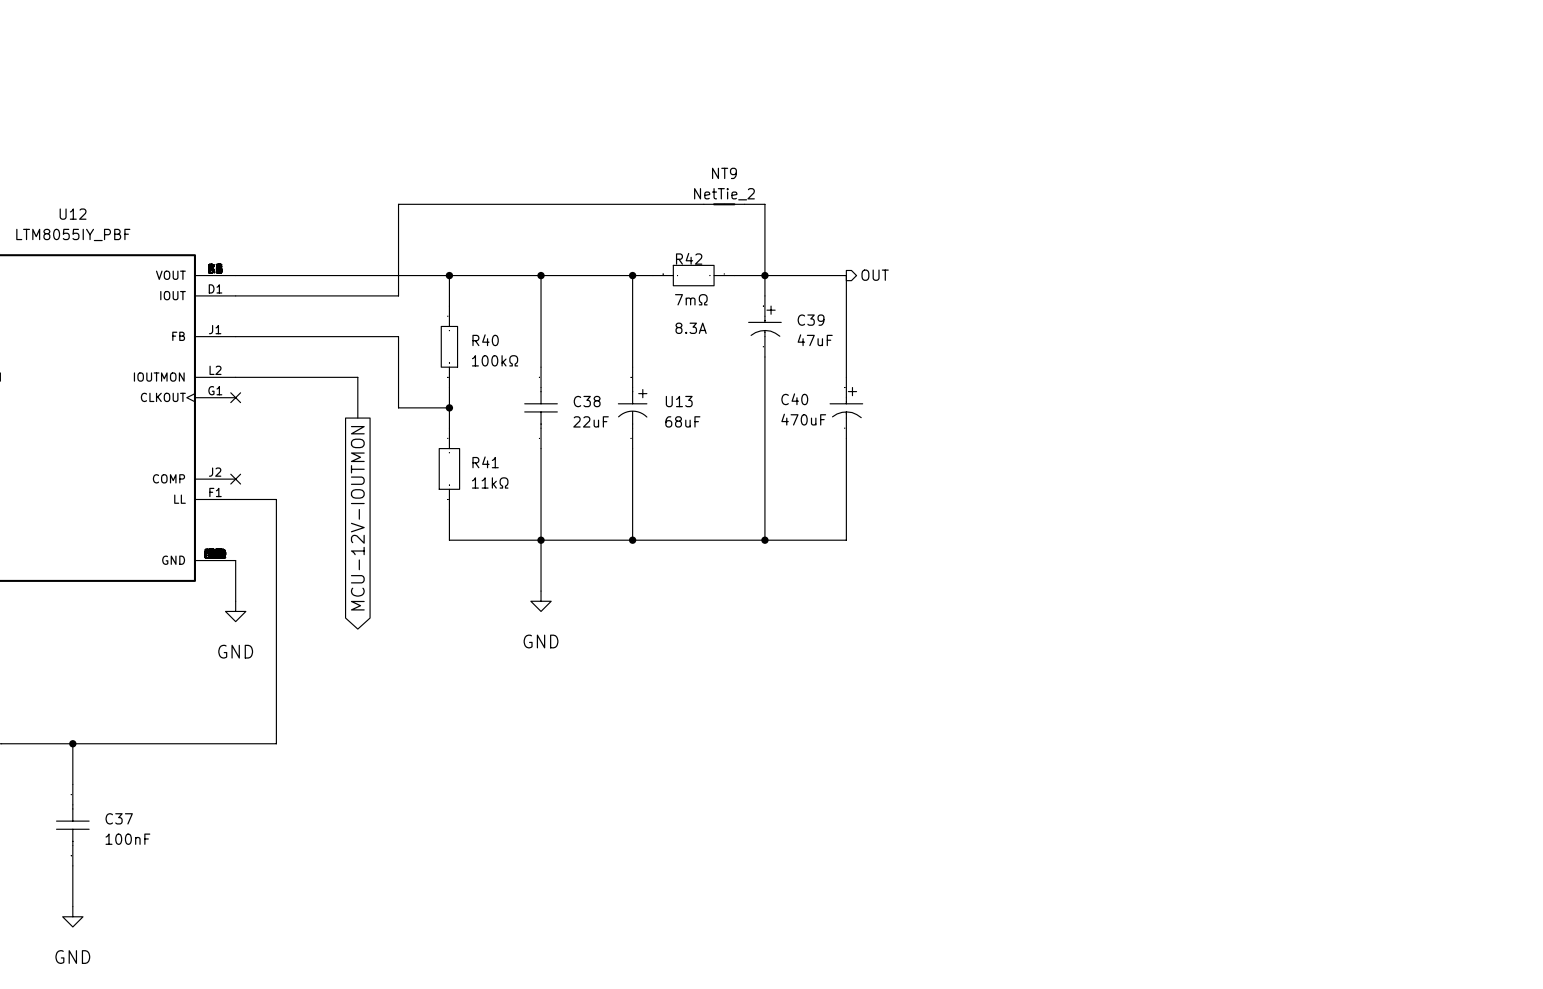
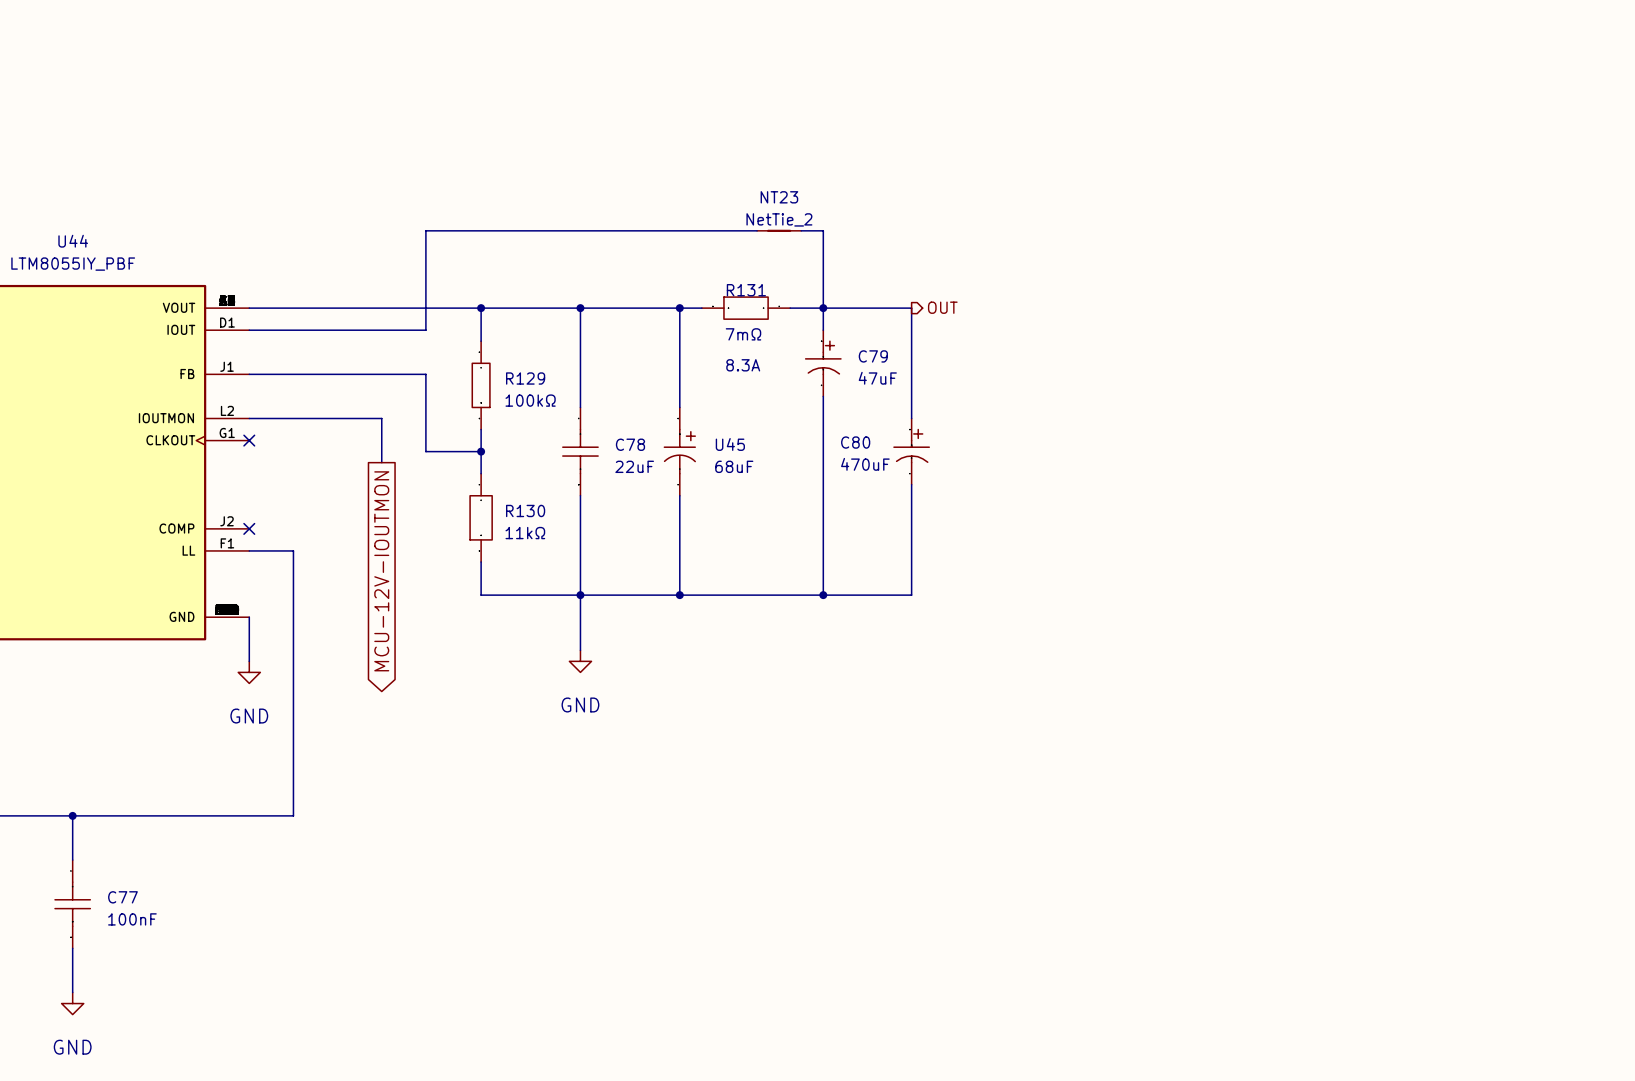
NT9 name: NT9 (724, 173) -> NT23 (779, 197)
U12 name: U12 (73, 214) -> U44 (73, 241)
R42 name: R42 (689, 258) -> R131 (746, 290)
C39 name: C39 (811, 320) -> C79 (873, 356)
R40 name: R40 (485, 340) -> R129 (525, 378)
C40 name: C40 (794, 399) -> C80 (855, 442)
C38 name: C38 (587, 401) -> C78 (630, 444)
U13 name: U13 (679, 401) -> U45 (730, 444)
R41 name: R41 (485, 462) -> R130 (525, 510)
C37 name: C37 (119, 818) -> C77 (122, 897)

